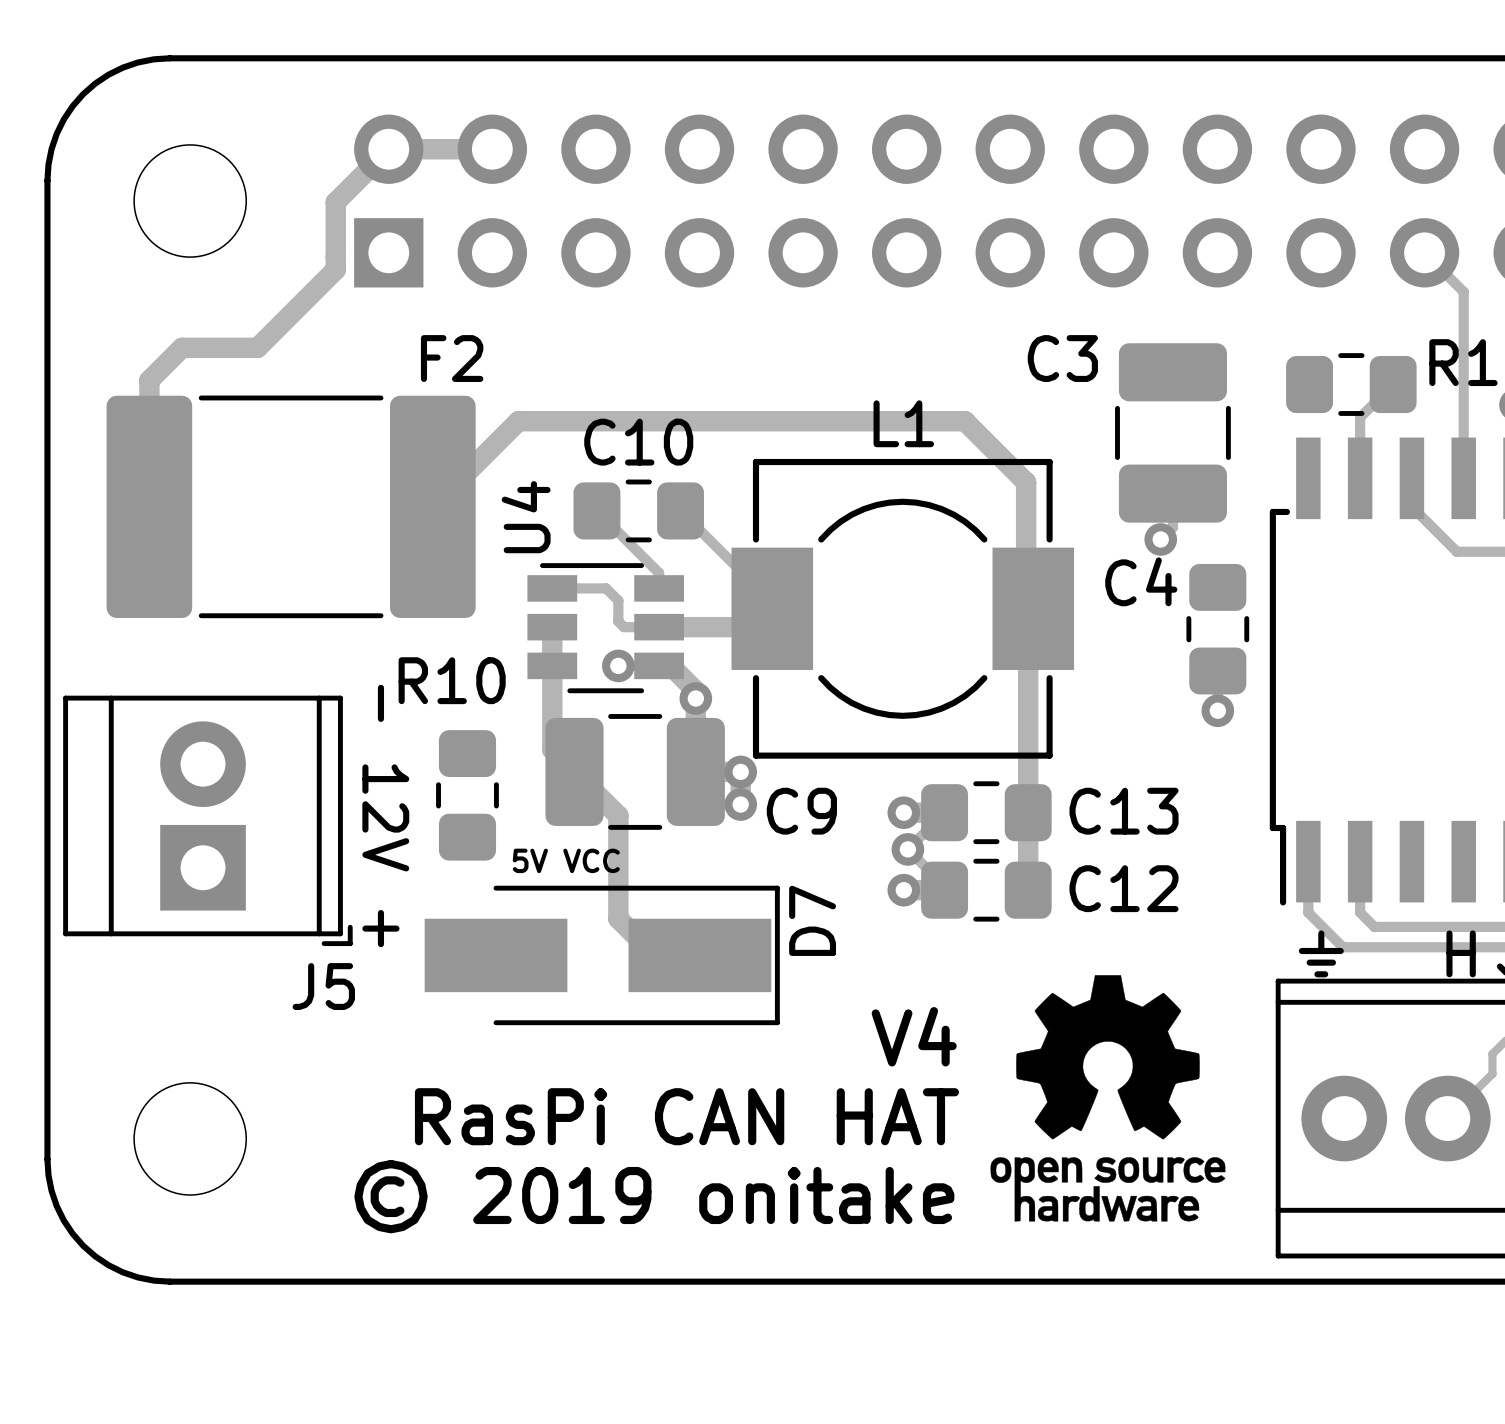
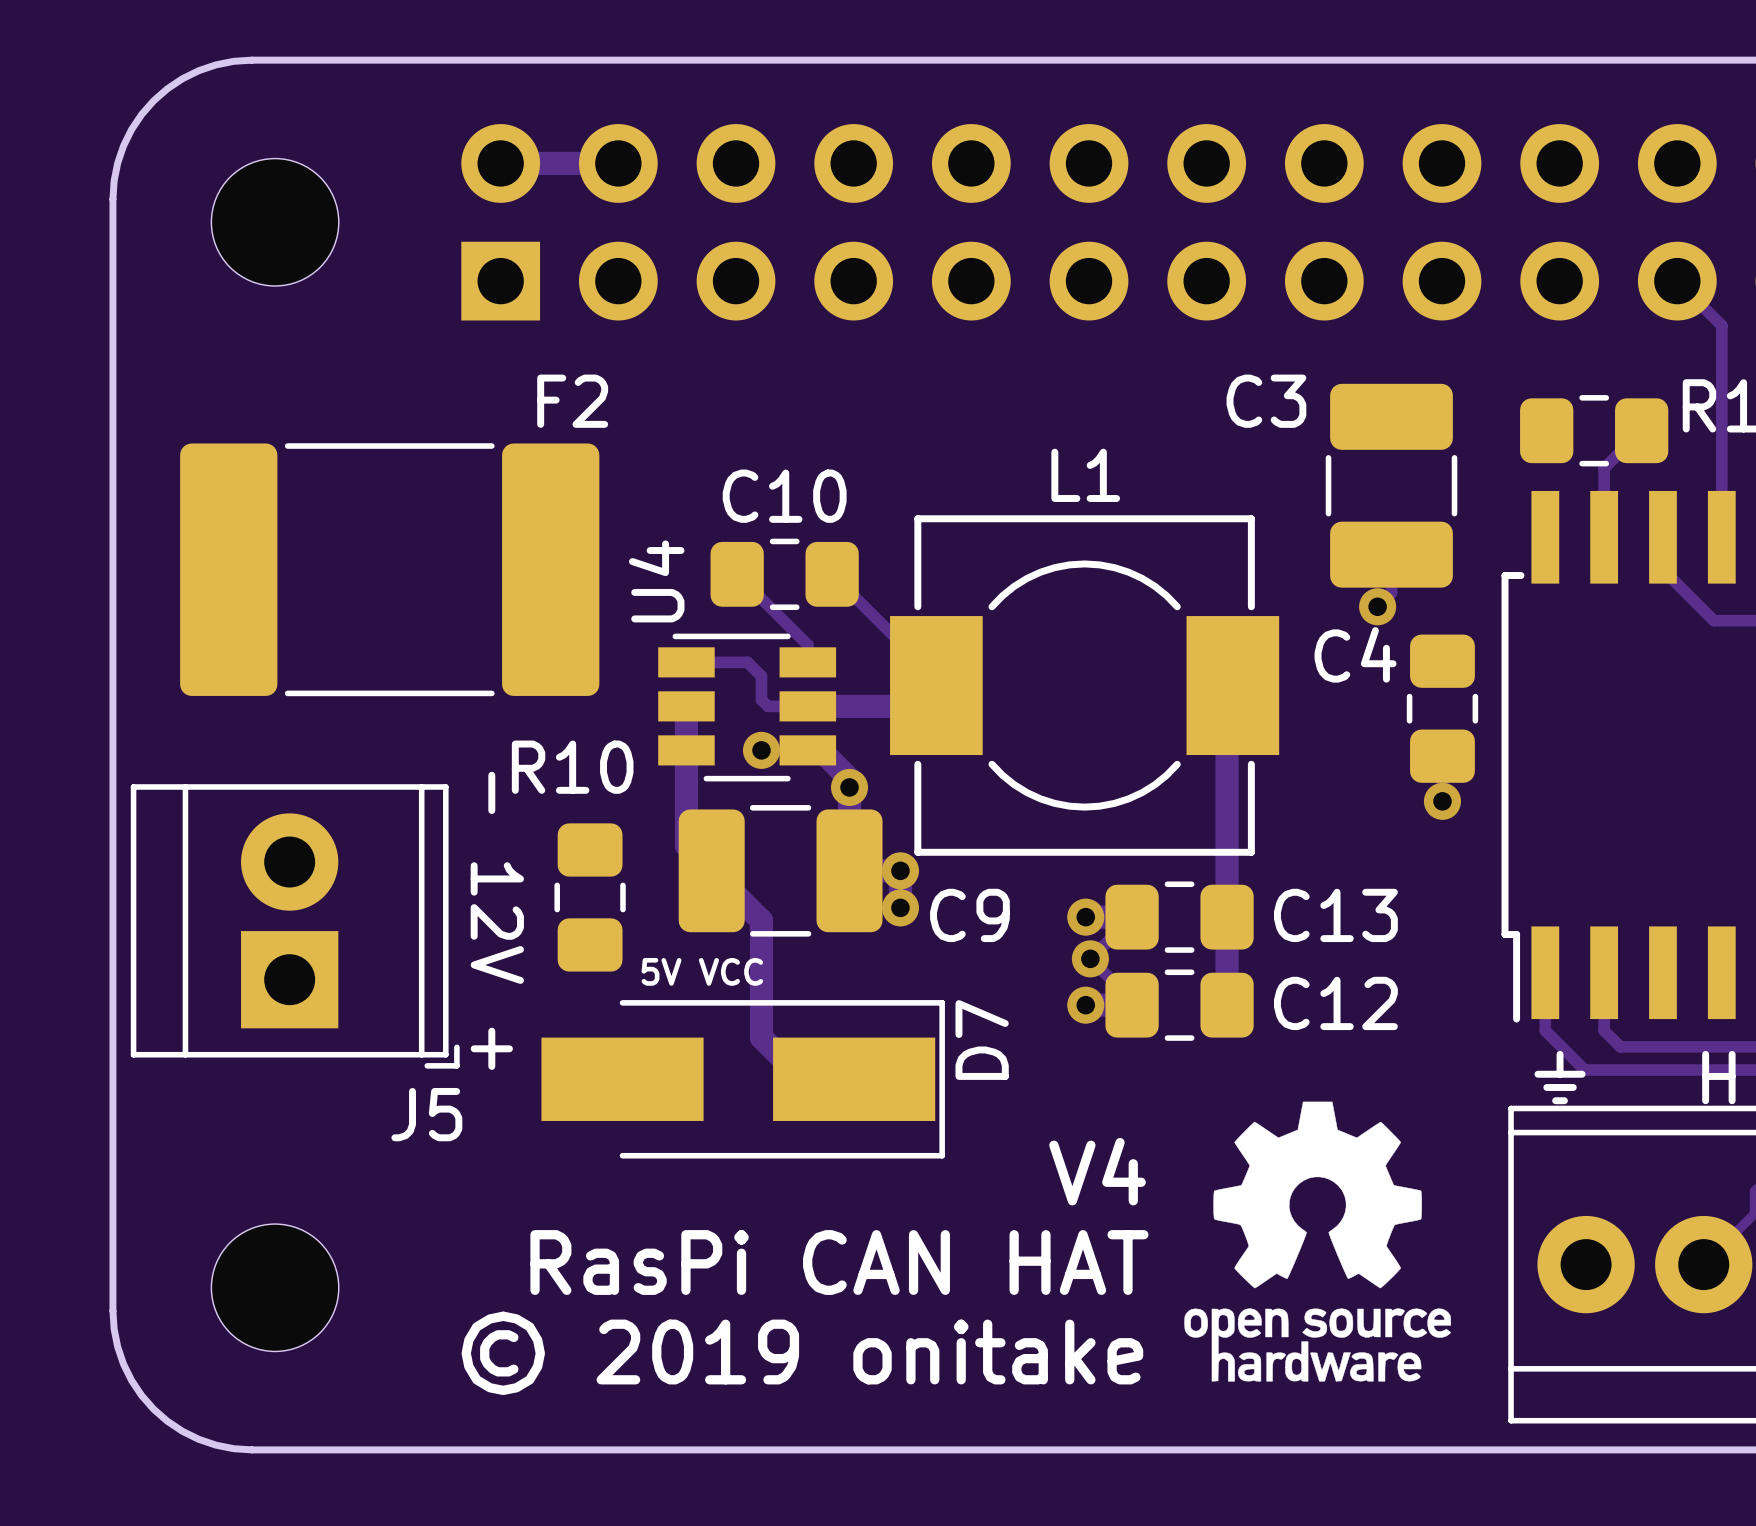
track: (388, 149) (335, 202) (335, 269) (257, 347) (182, 347) (149, 380) (149, 506) -> none
track: (432, 506) (518, 421) (964, 421) (1026, 482) (1026, 608) (1028, 610) -> none

